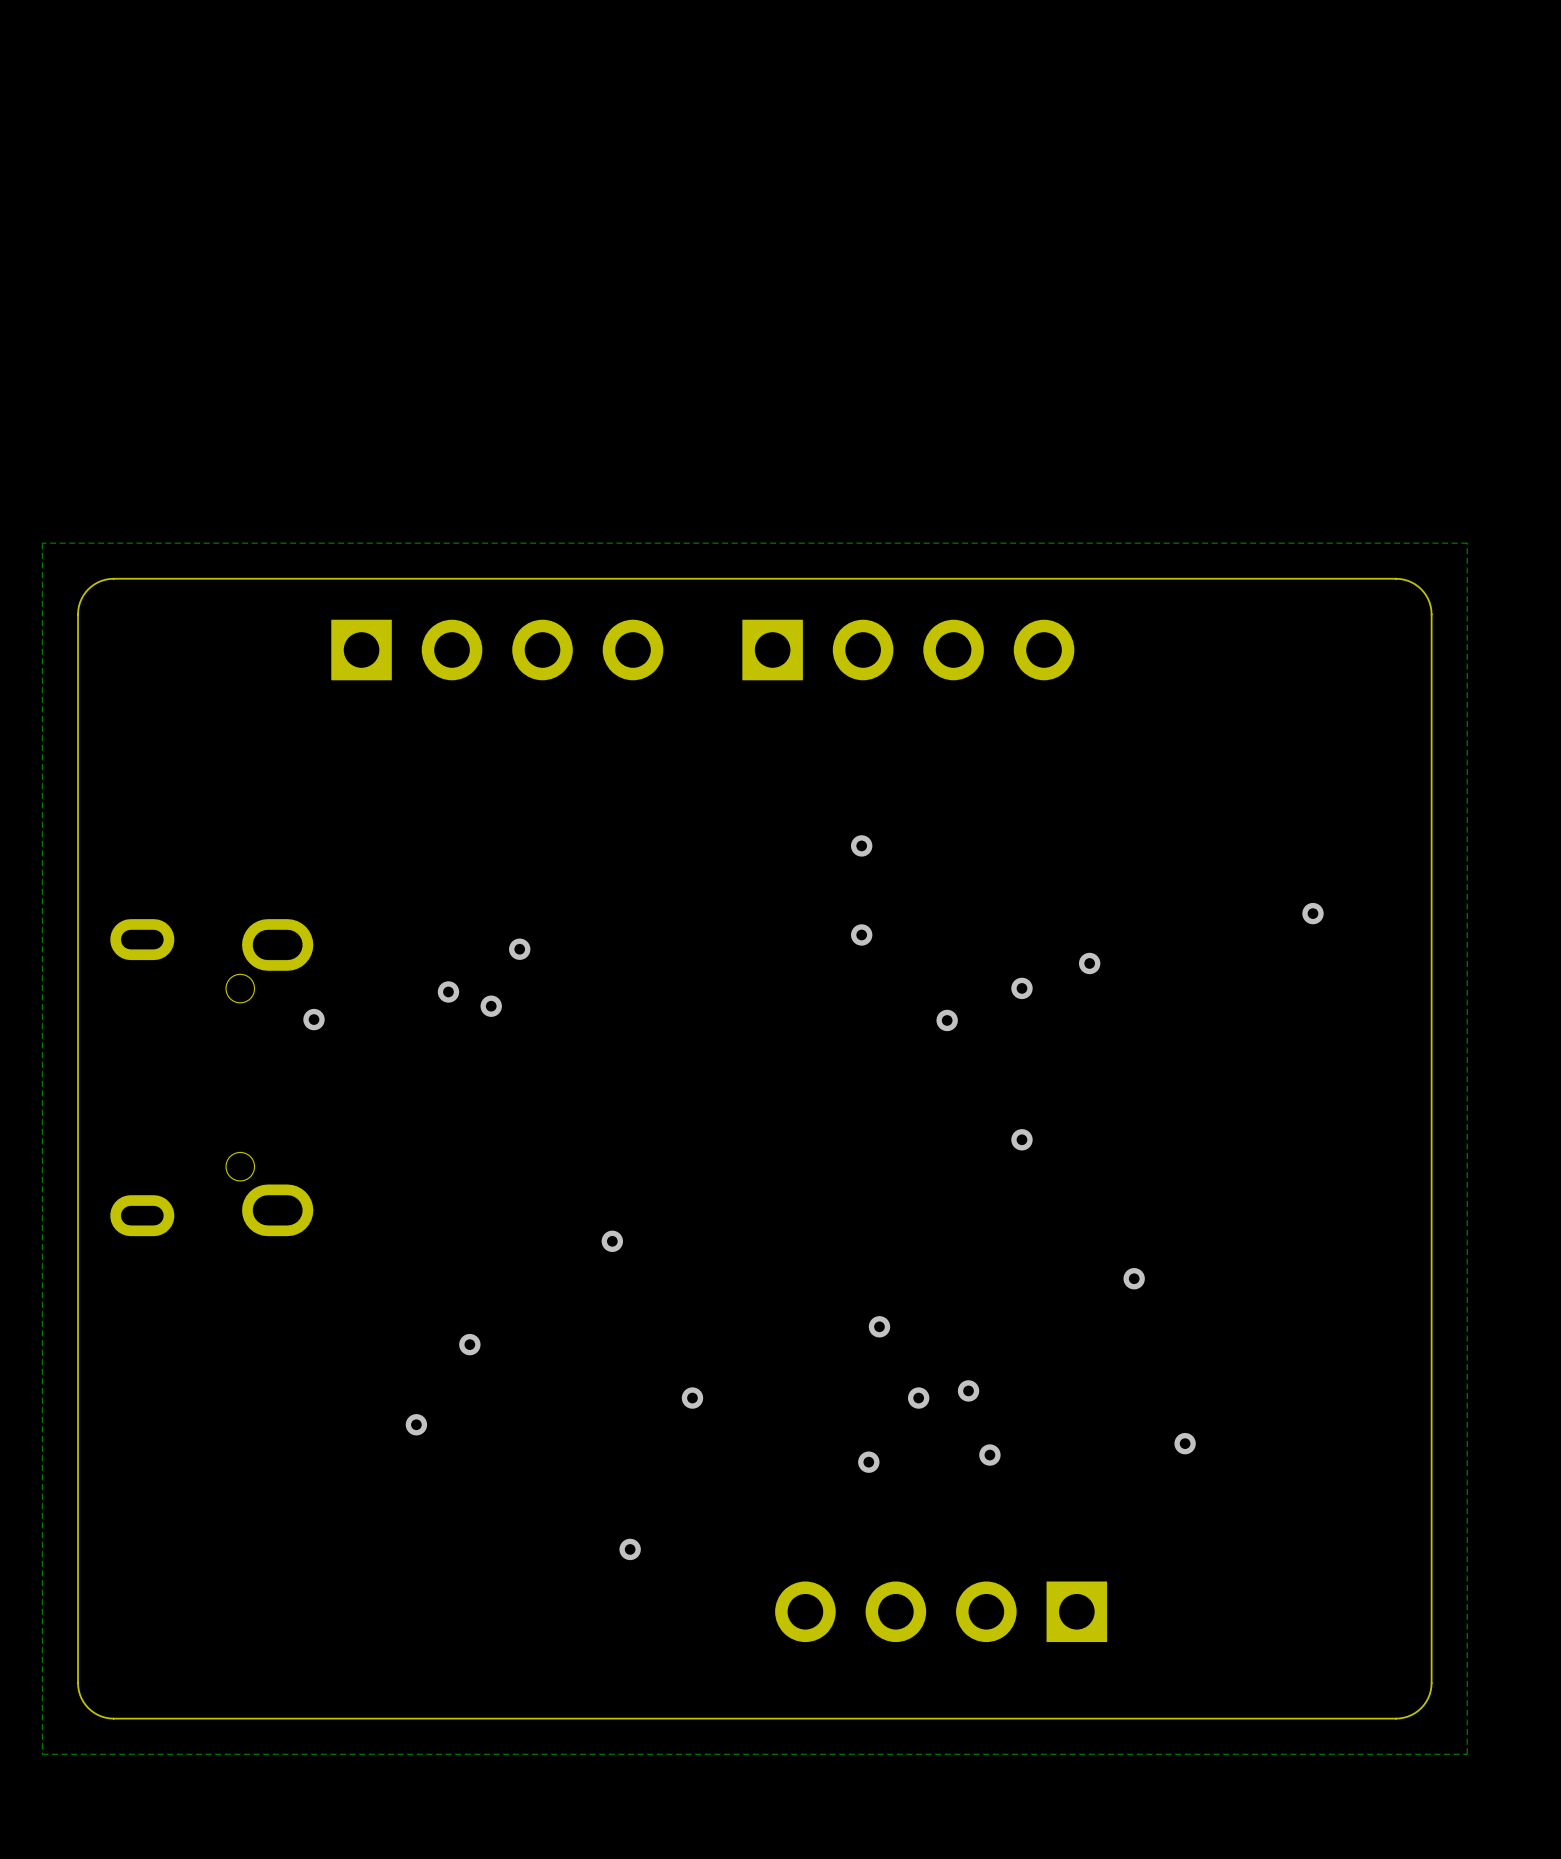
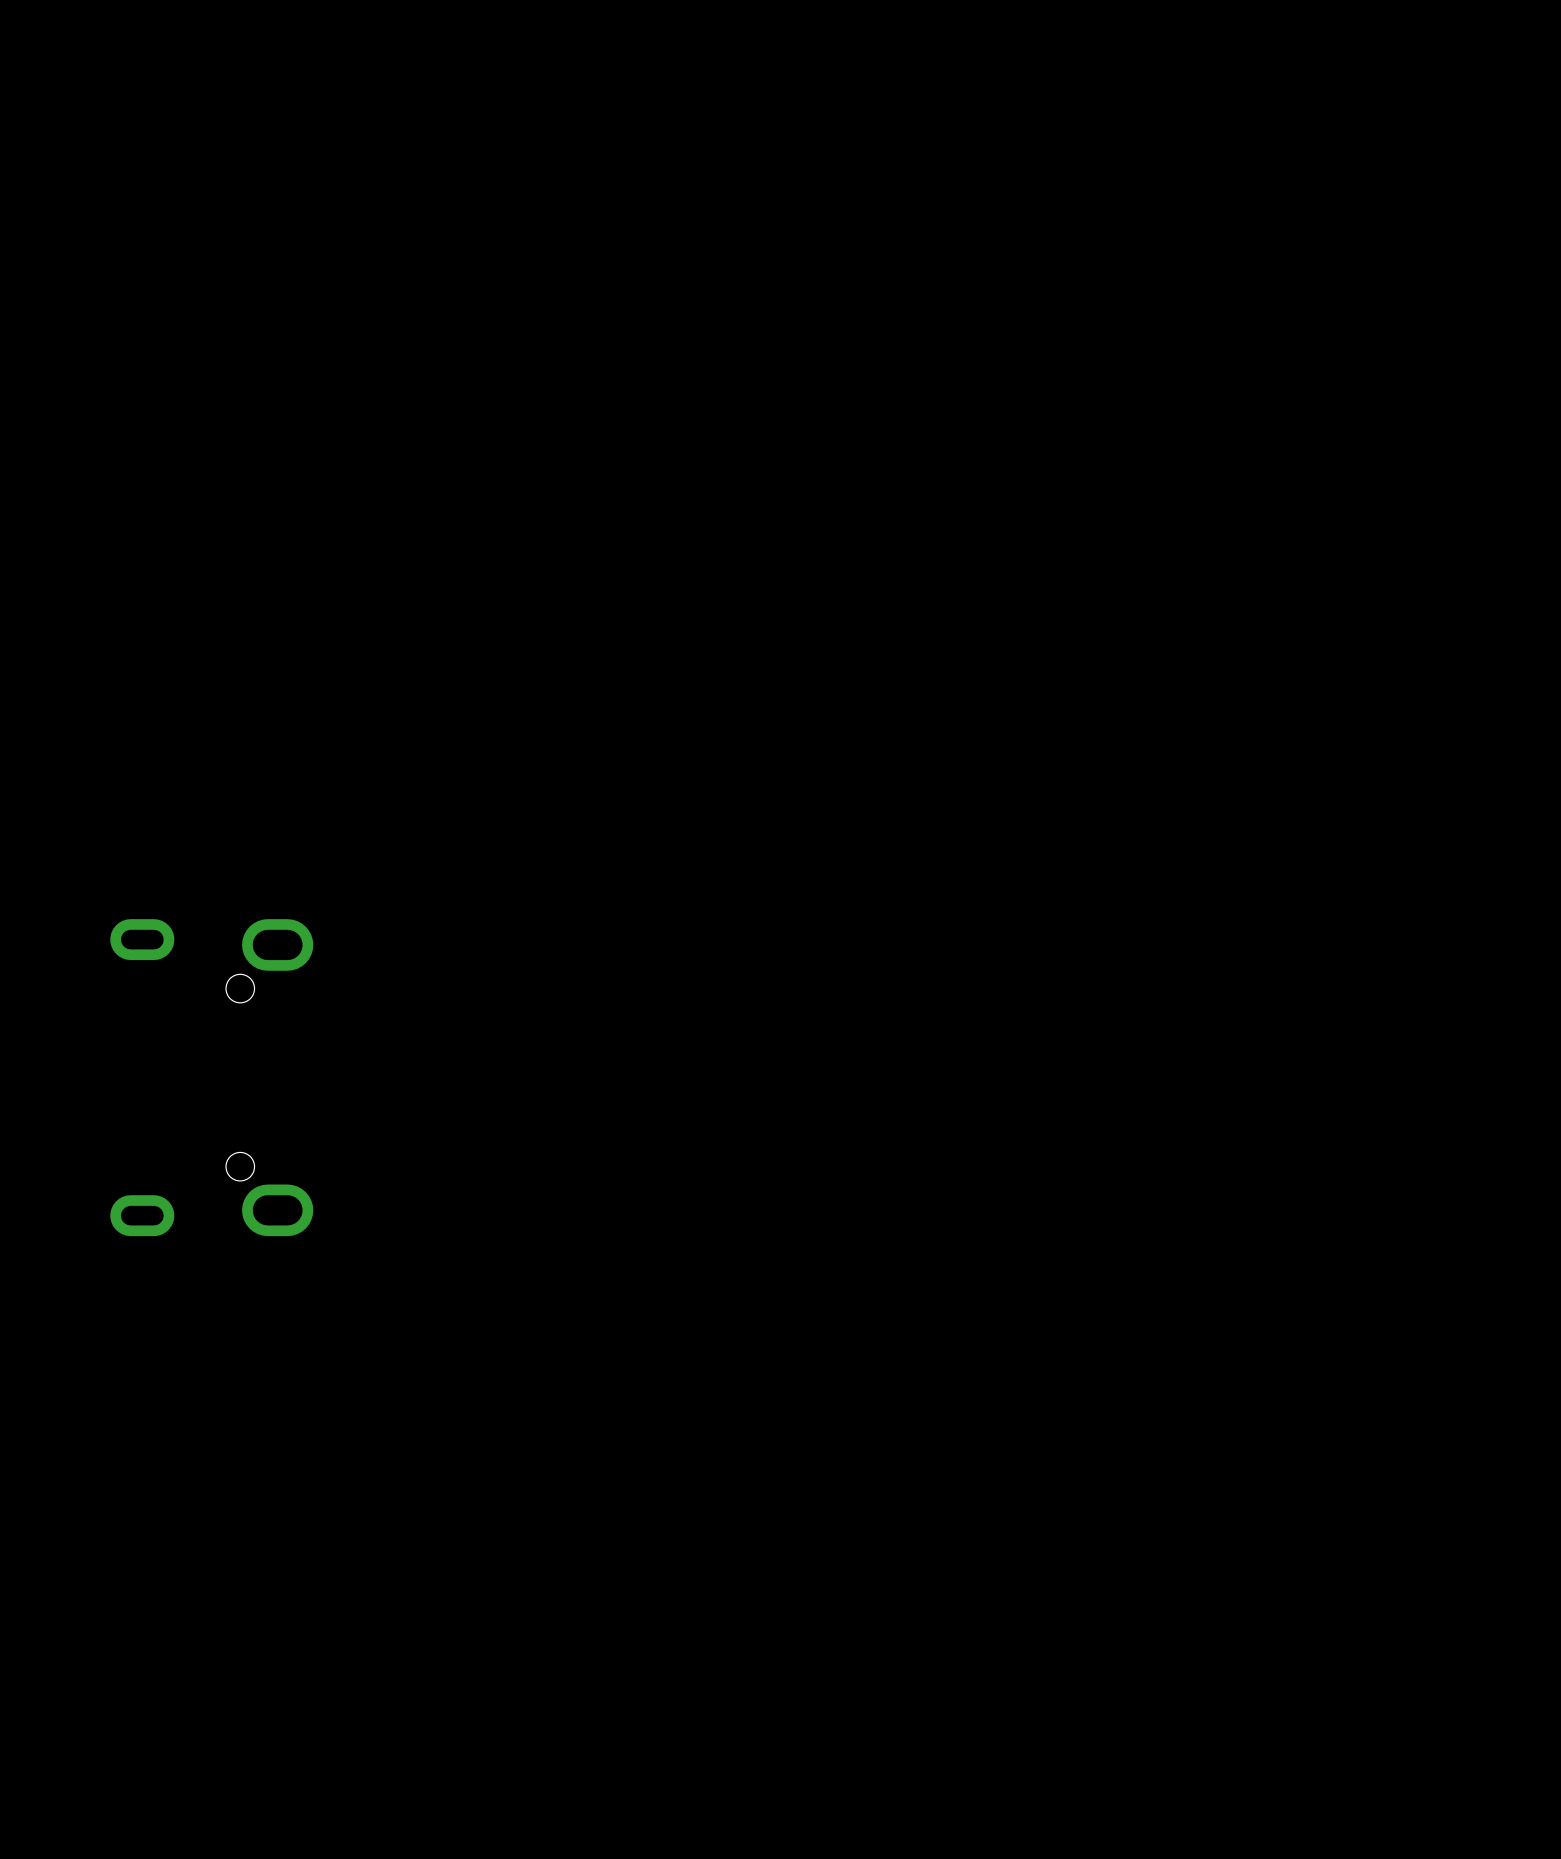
zone outline: (1467, 543) (42, 543) (42, 1754) (1467, 1754) (1467, 543) -> none
board edge: (1395, 578) (113, 578) (101, 580) (91, 586) (81, 598) (78, 614) (78, 1683) (80, 1694) (85, 1705) (98, 1715) (113, 1718) (1395, 1718) (1407, 1716) (1418, 1710) (1428, 1698) (1431, 1683) (1431, 614) (1429, 602) (1421, 589) (1407, 580) (1395, 578) -> none
part: (497, 650) -> none
part: (908, 650) -> none
via: (861, 845) -> none
via: (1312, 913) -> none
via: (861, 934) -> none
via: (519, 949) -> none
via: (1089, 963) -> none
via: (1021, 988) -> none
via: (448, 991) -> none
via: (491, 1006) -> none
via: (314, 1019) -> none
via: (947, 1020) -> none
via: (1021, 1139) -> none
via: (612, 1241) -> none
via: (1134, 1278) -> none
via: (879, 1326) -> none
via: (469, 1344) -> none
via: (968, 1390) -> none
via: (692, 1398) -> none
via: (918, 1398) -> none
via: (416, 1424) -> none
via: (1185, 1443) -> none
via: (989, 1455) -> none
via: (868, 1462) -> none
via: (630, 1549) -> none
part: (941, 1611) -> none

